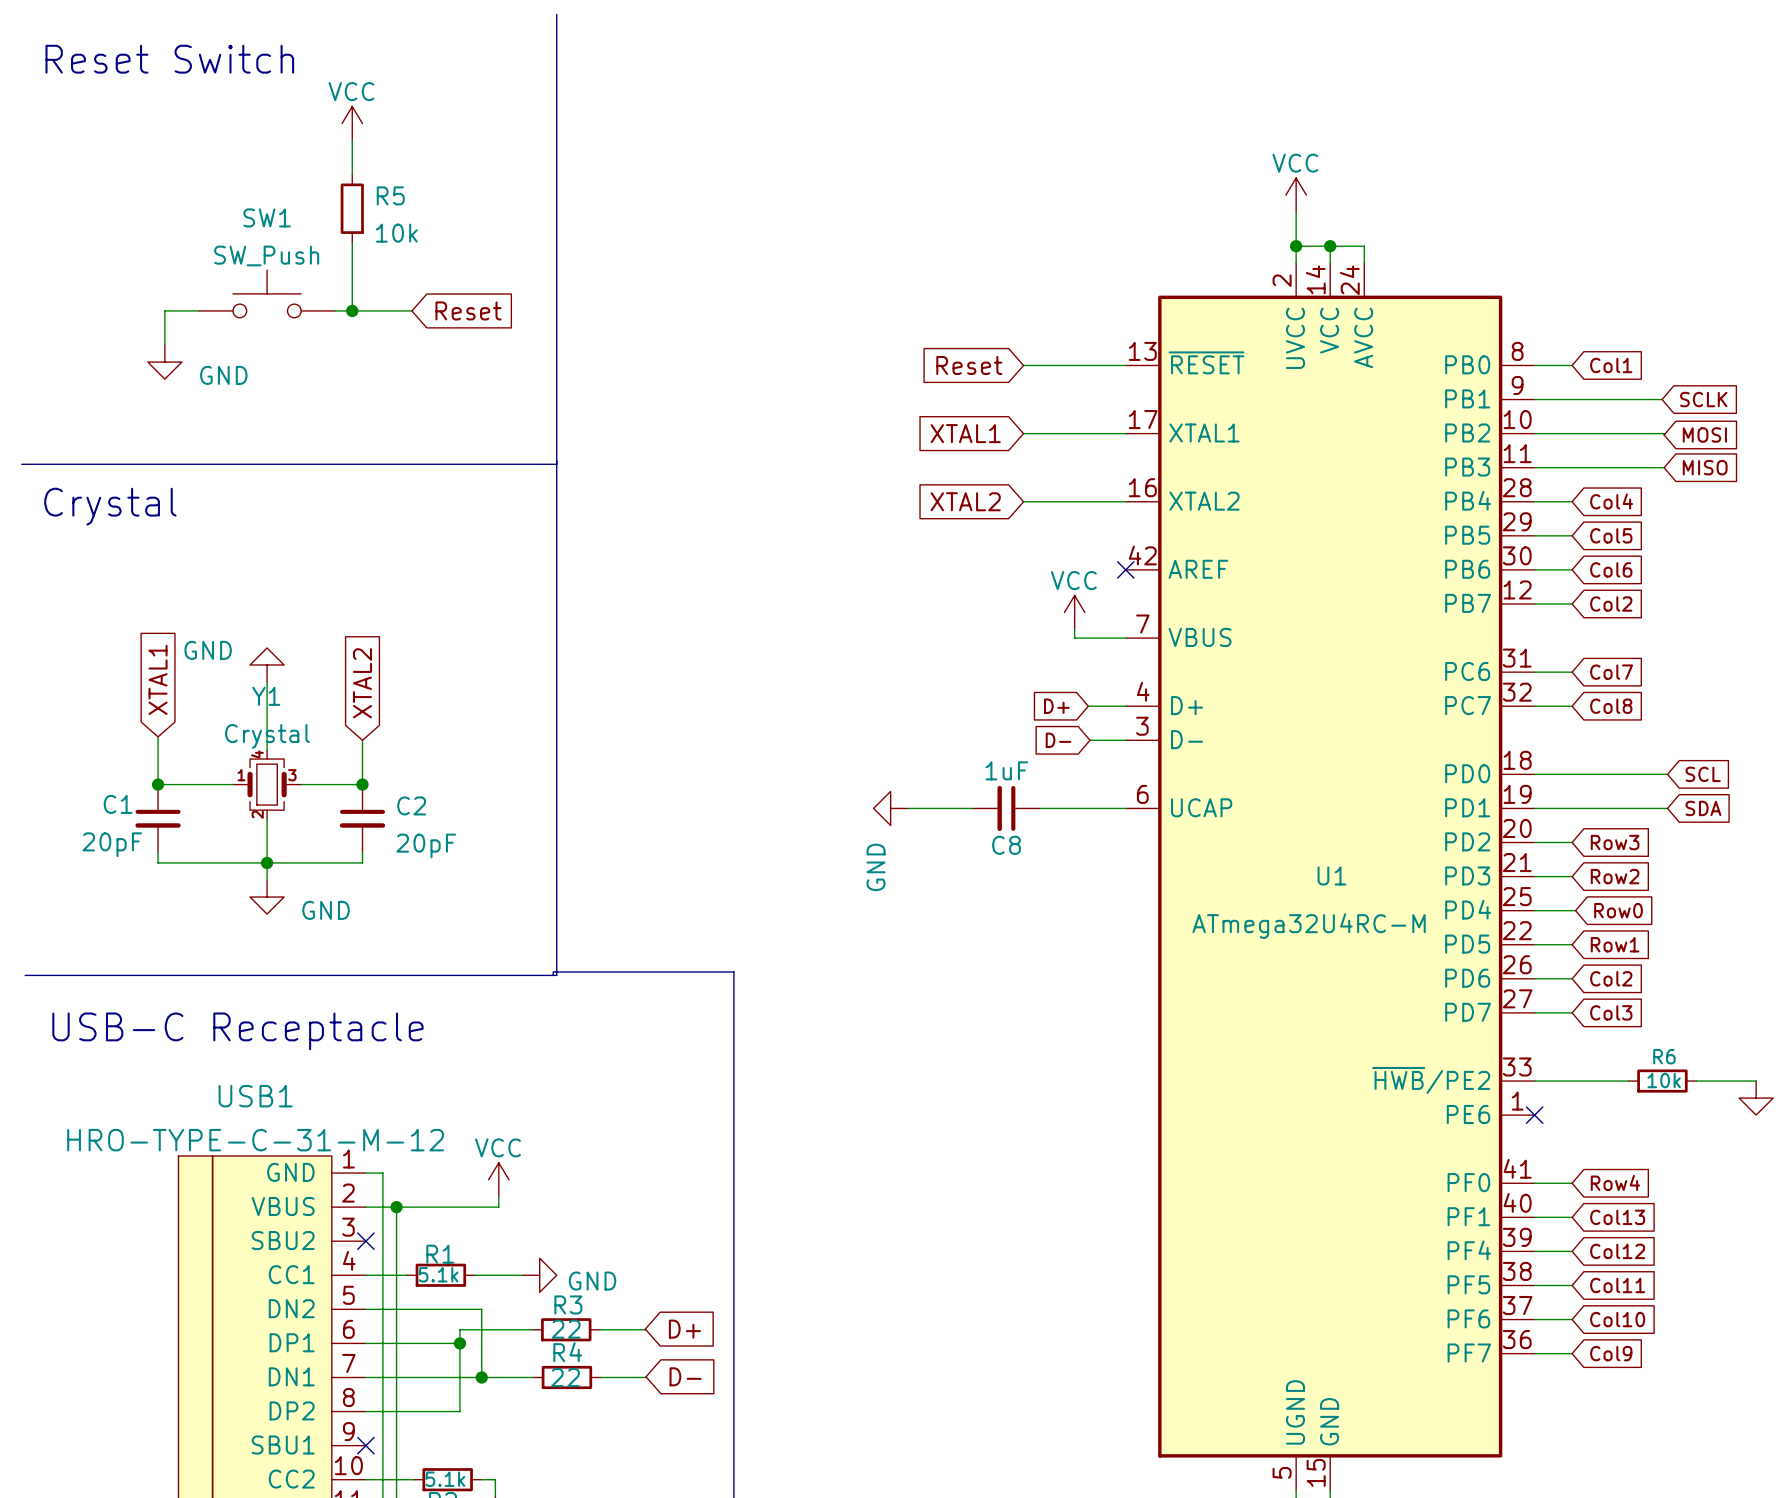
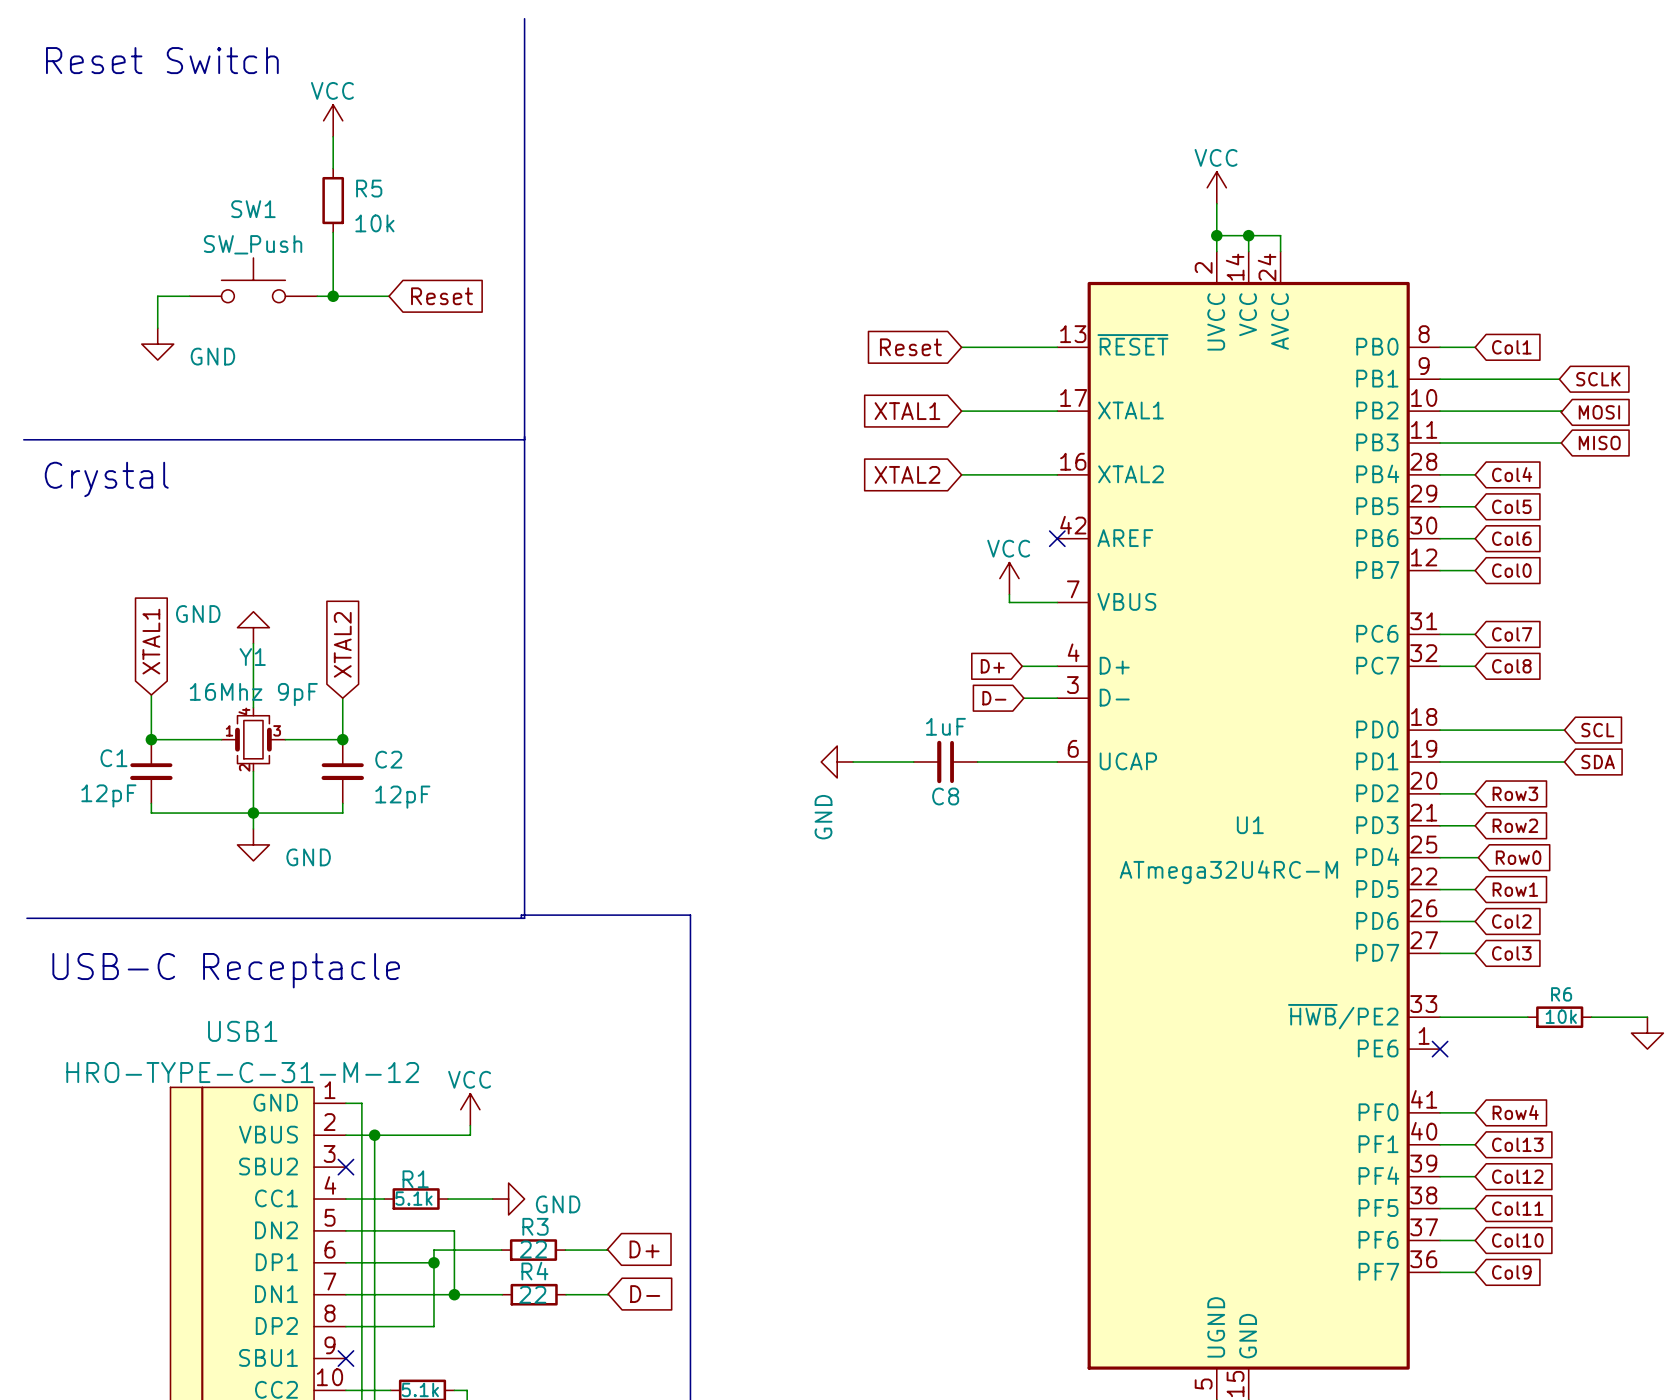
global label: Col2 (1611, 603) -> Col0 (1511, 570)
Y1 value: Crystal (267, 736) -> 16Mhz 9pF (253, 694)
C1 value: 20pF (112, 844) -> 12pF (108, 795)
C2 value: 20pF (426, 845) -> 12pF (402, 797)

